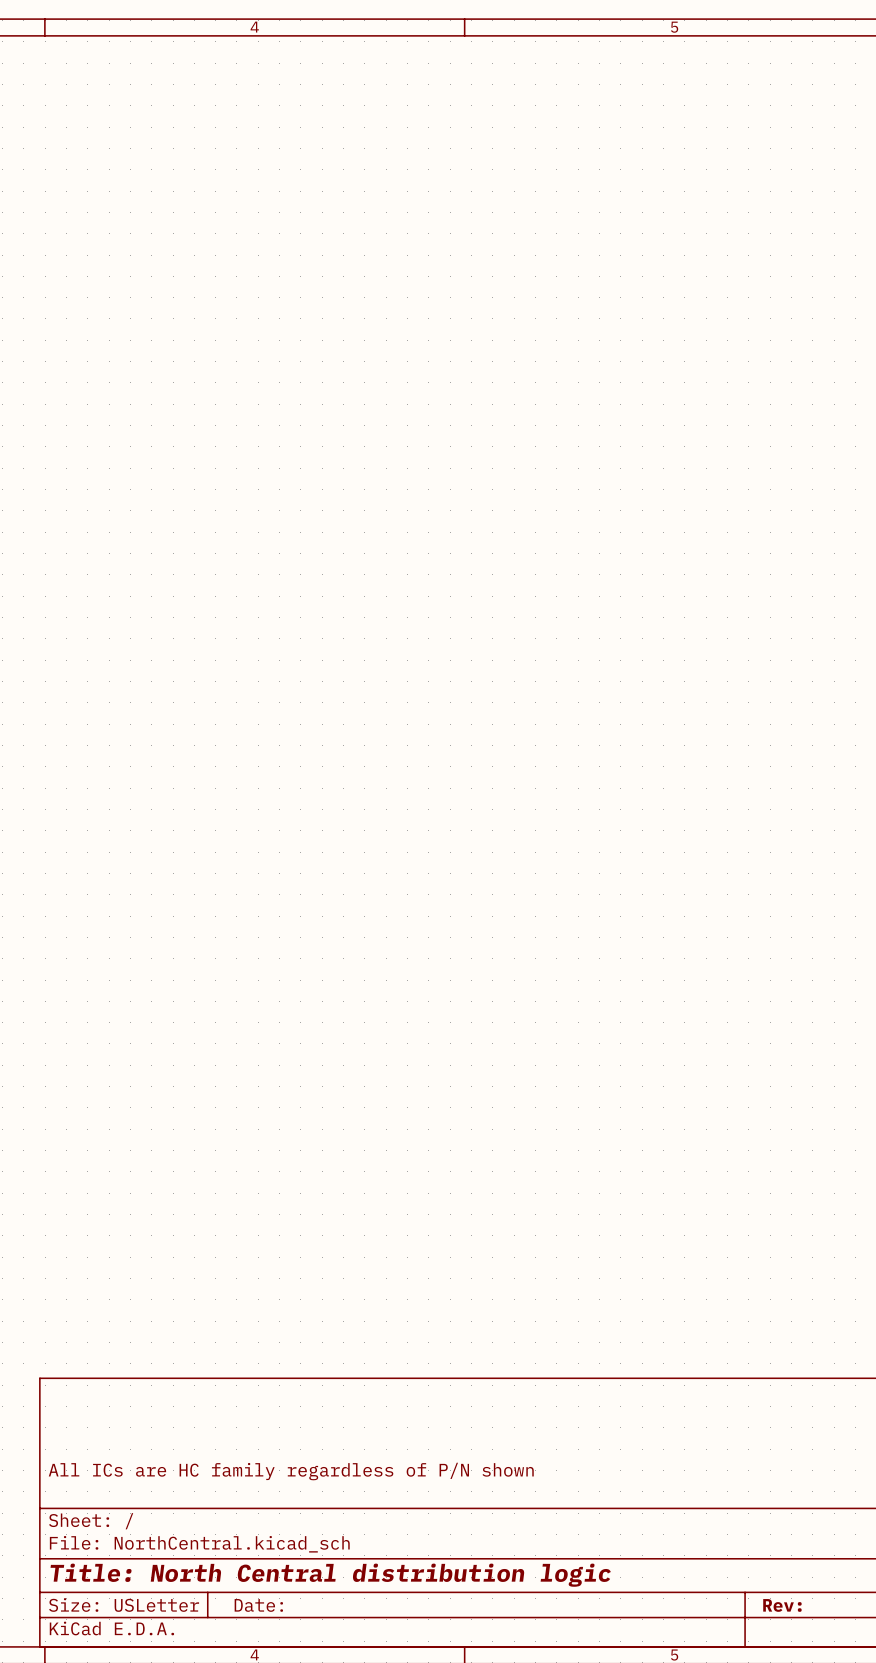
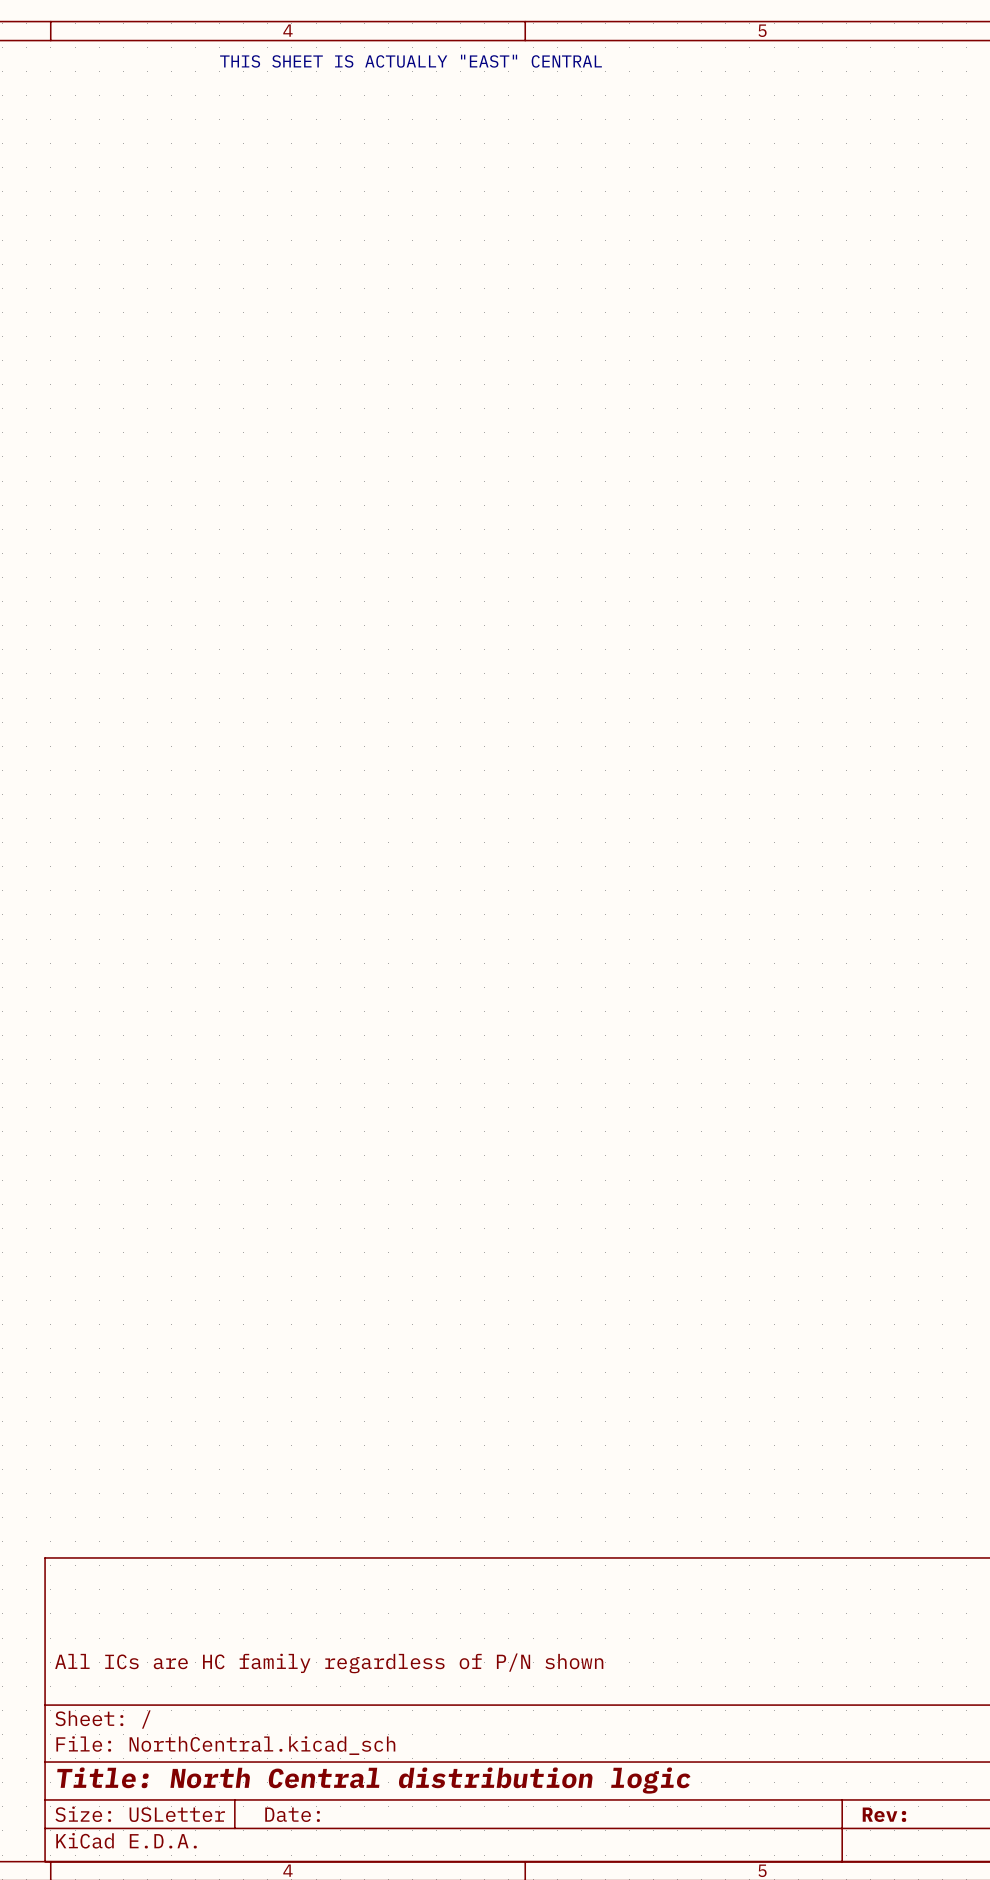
text: none -> THIS SHEET IS ACTUALLY "EAST" CENTRAL (410, 61)

